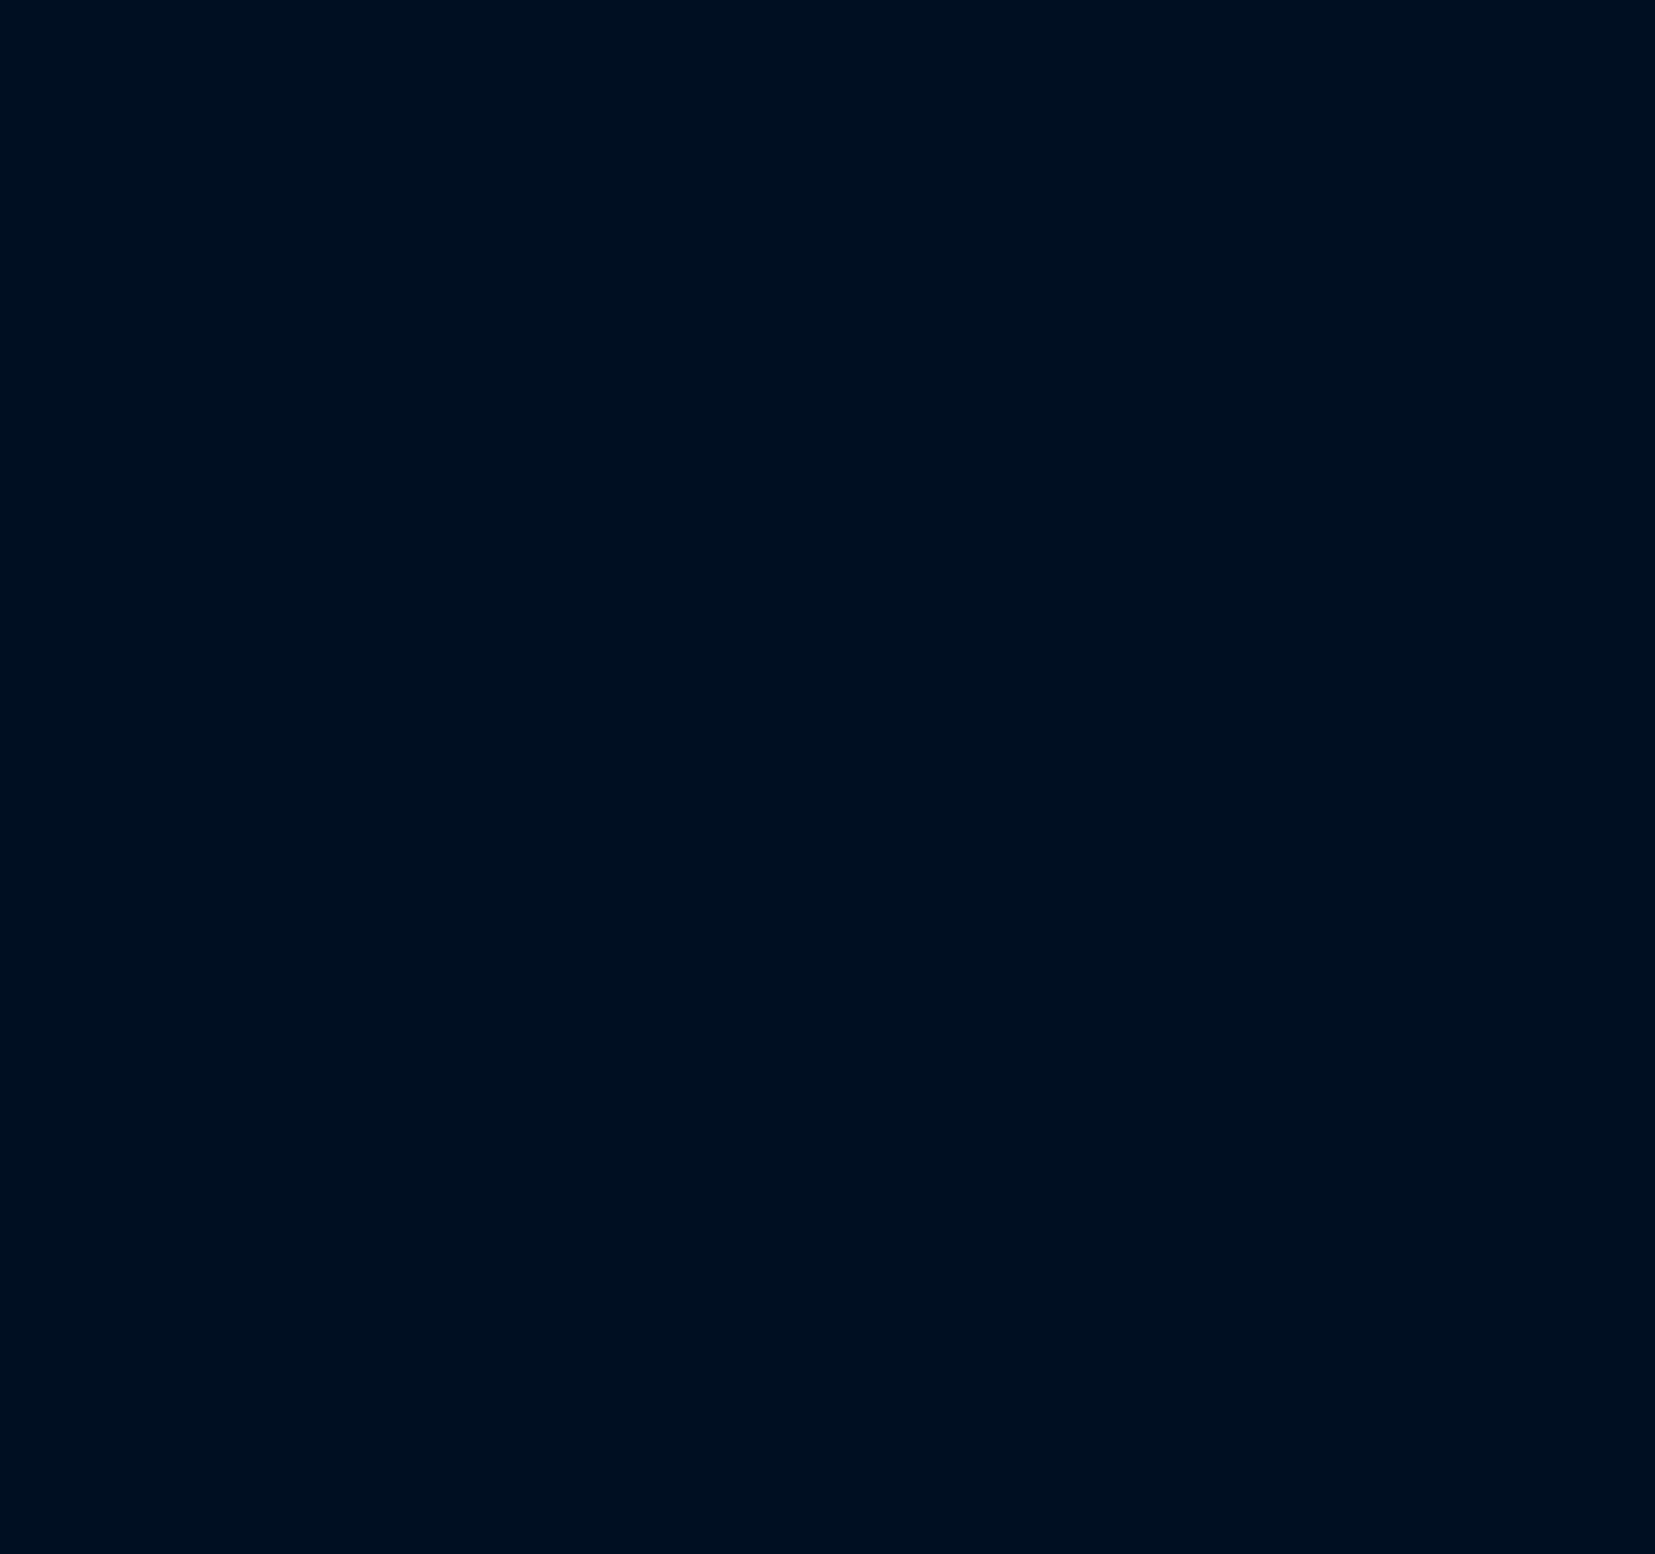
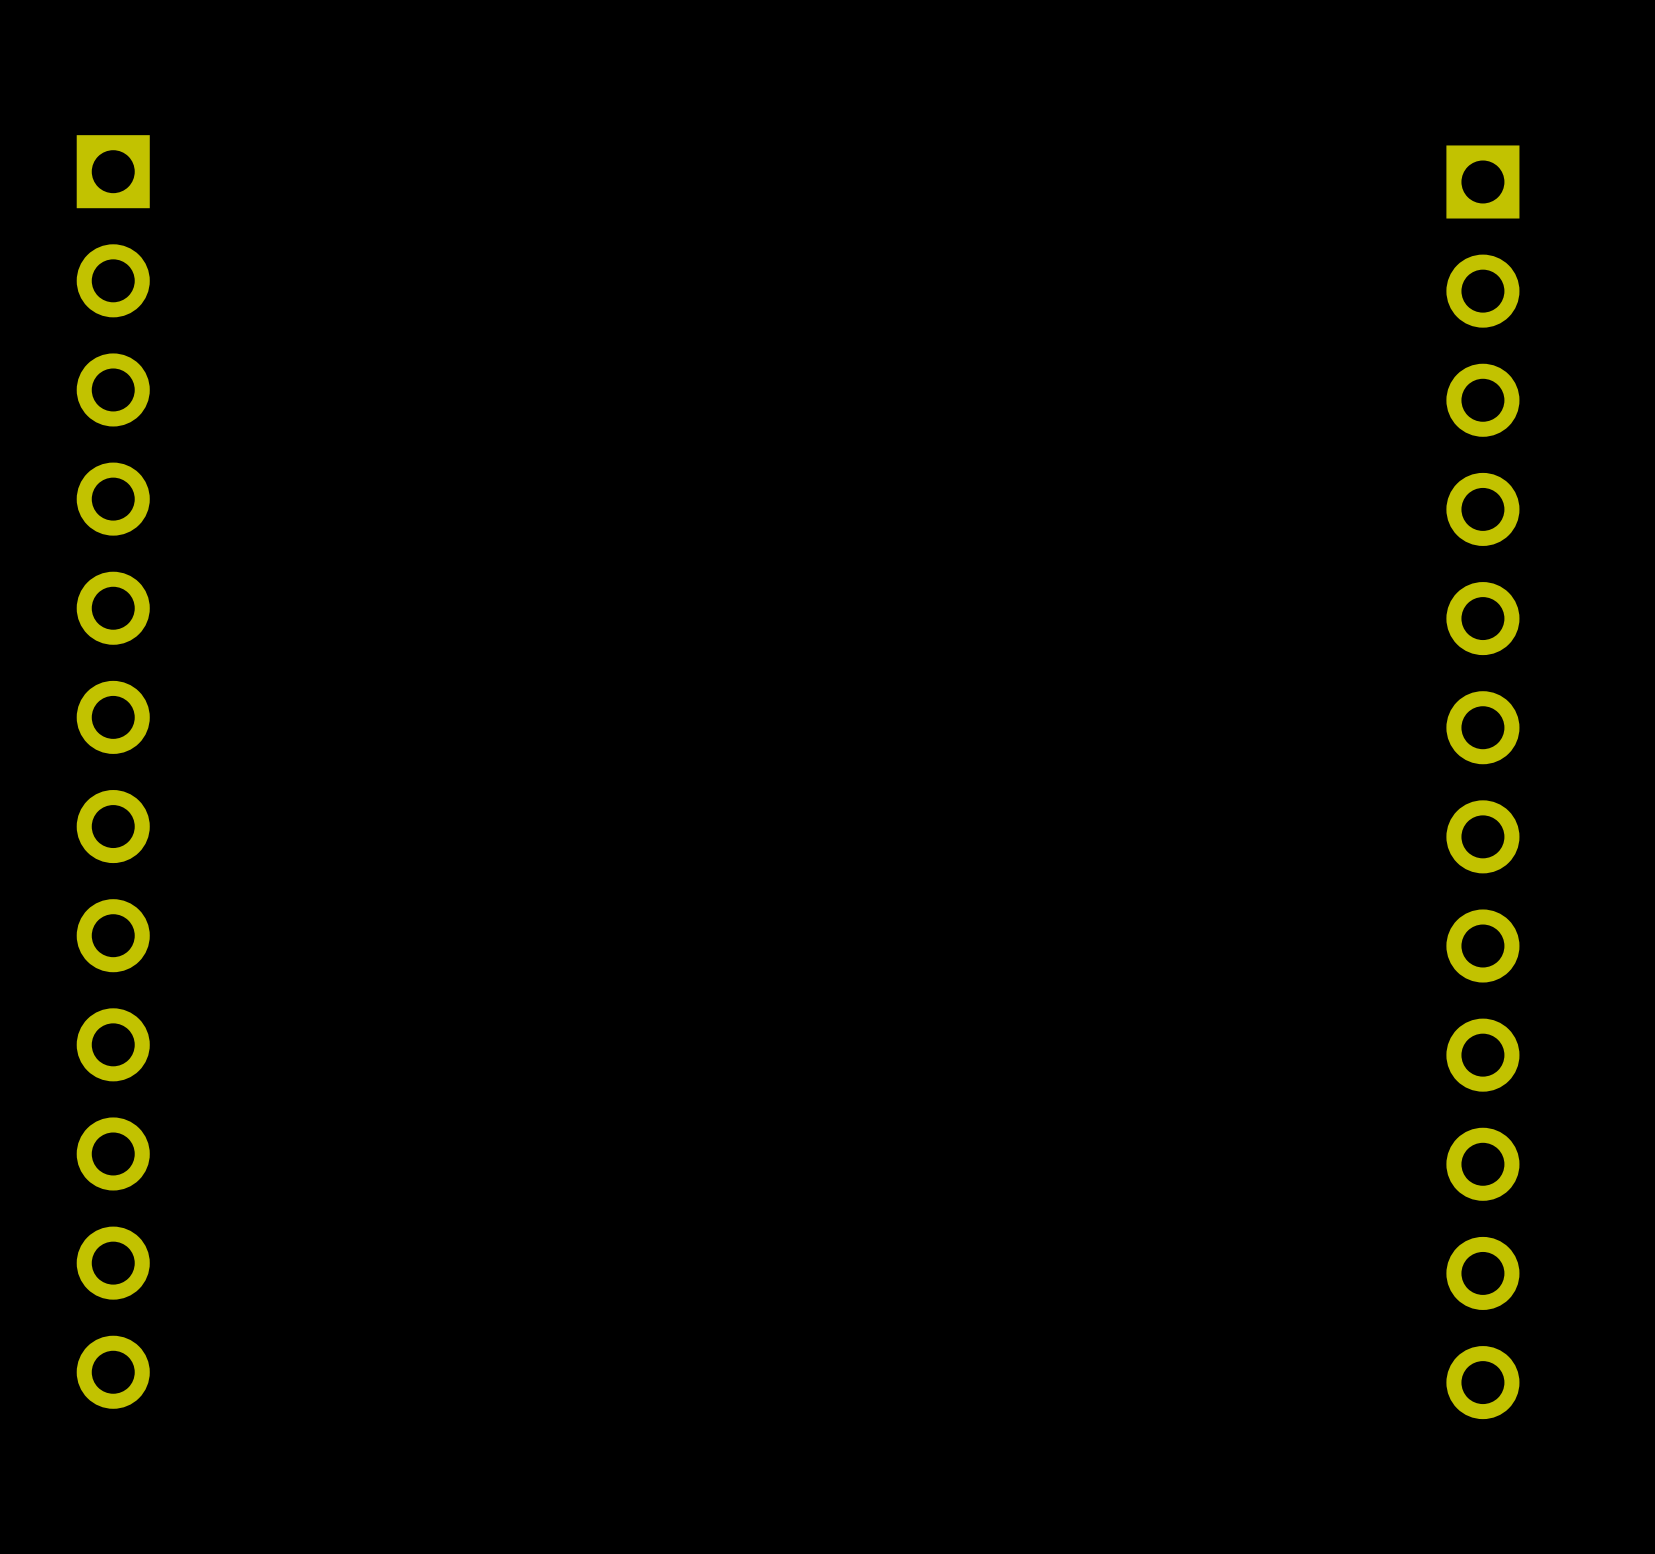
part: none -> (113, 771)
part: none -> (1482, 782)

